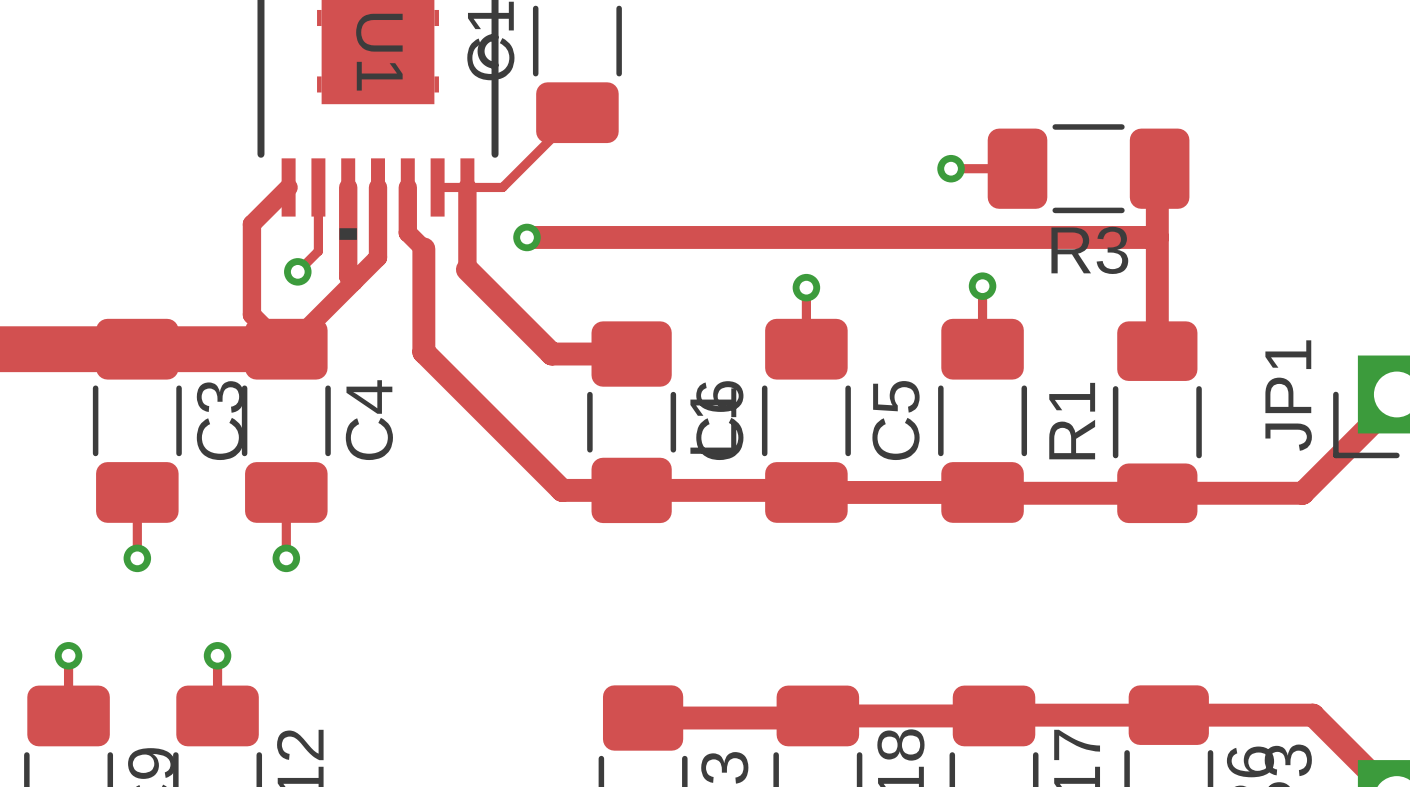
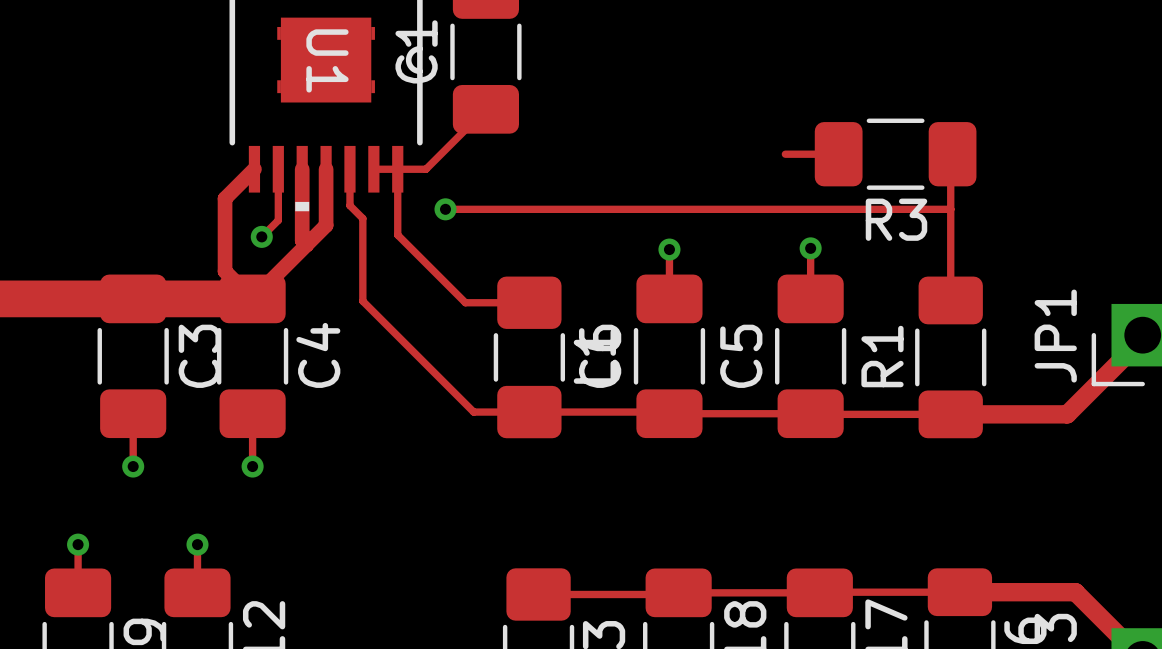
via: (951, 168) -> none
track width: thick (1157, 170) (1157, 351) -> thin (950, 156) (950, 300)
track width: thick (407, 187) (407, 232) (423, 248) (423, 352) (562, 490) (791, 490) -> thin (349, 169) (349, 205) (362, 218) (362, 301) (473, 412) (657, 412)
track width: thick (467, 187) (467, 269) (551, 354) (631, 354) -> thin (397, 169) (397, 235) (465, 302) (529, 302)
track width: thick (526, 237) (1157, 237) -> thin (445, 209) (950, 209)
track width: thick (806, 492) (982, 492) -> thin (669, 413) (810, 413)
track width: thick (983, 493) (1157, 493) -> thin (811, 414) (950, 414)
track width: thick (817, 715) (994, 715) -> thin (678, 592) (819, 592)
track width: thick (994, 715) (1168, 715) -> thin (820, 592) (959, 592)
track width: thick (643, 718) (815, 718) -> thin (538, 594) (676, 594)

